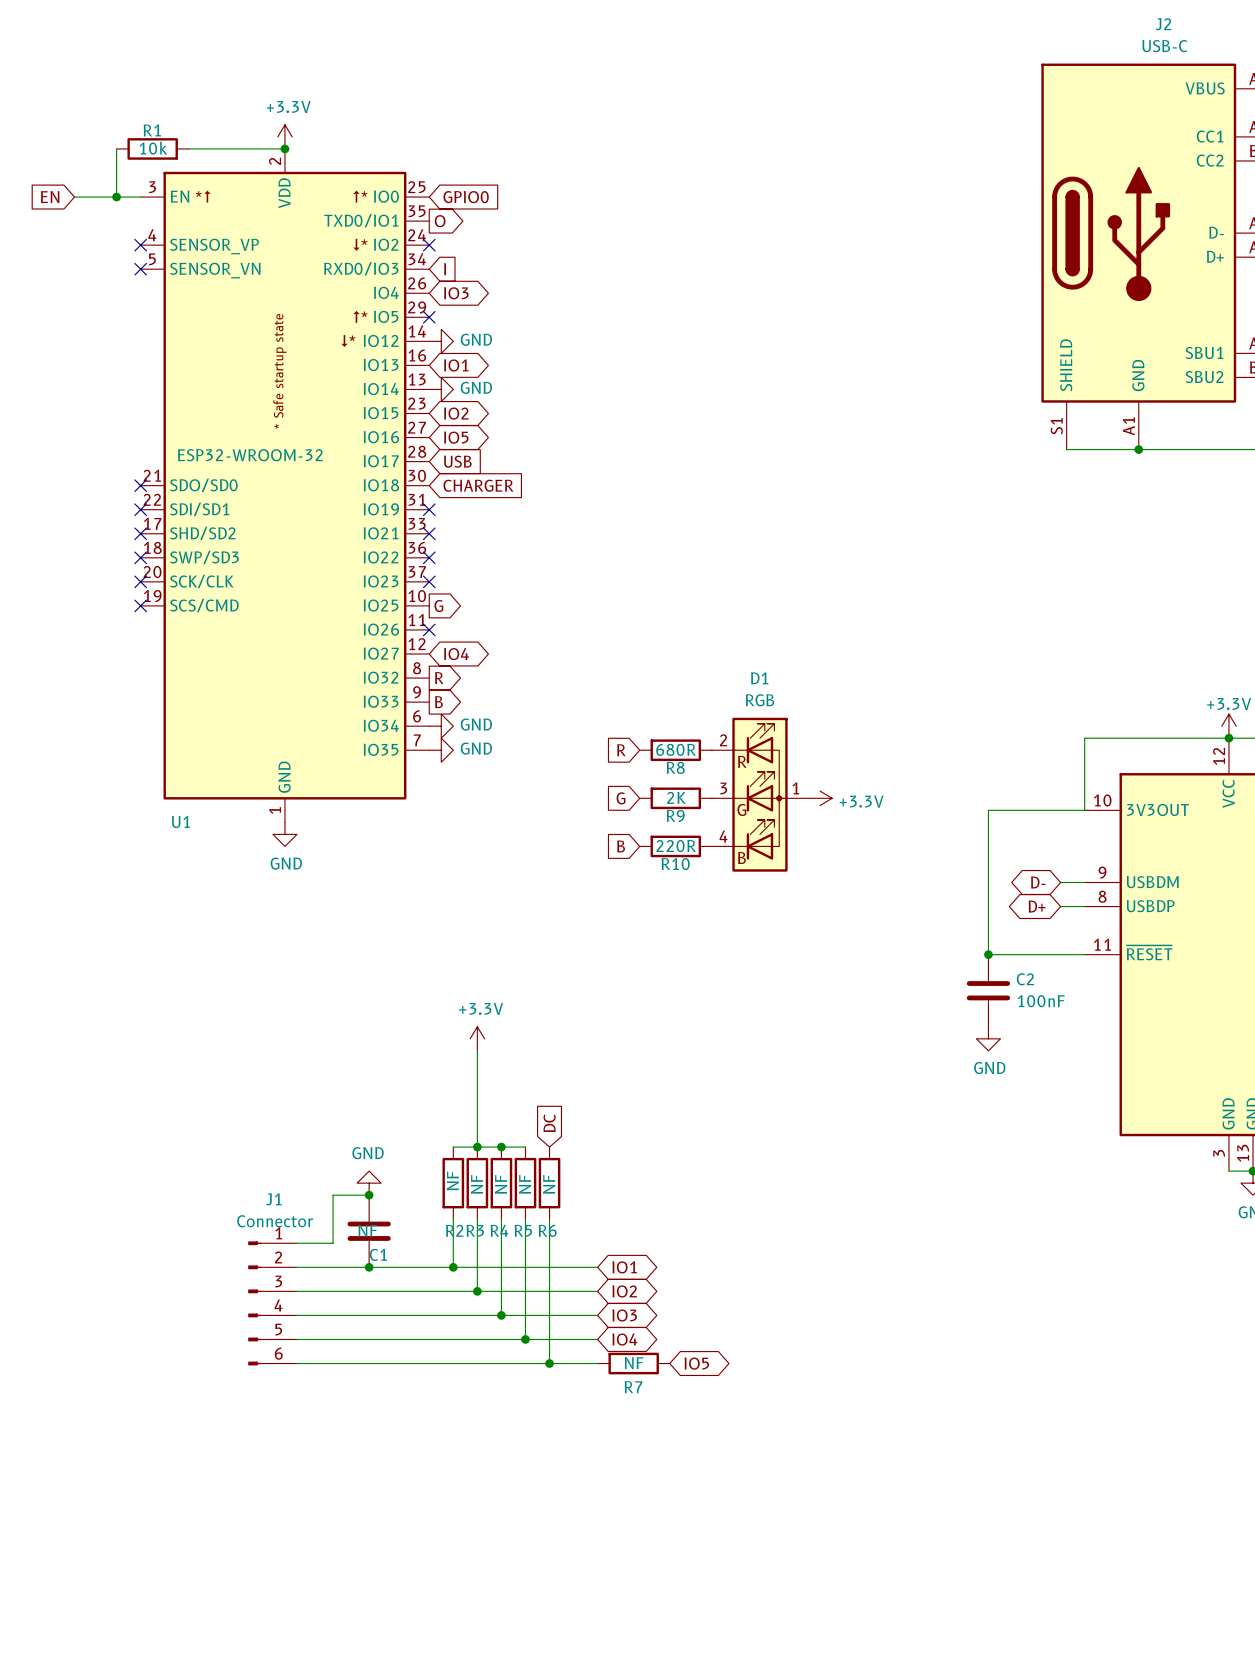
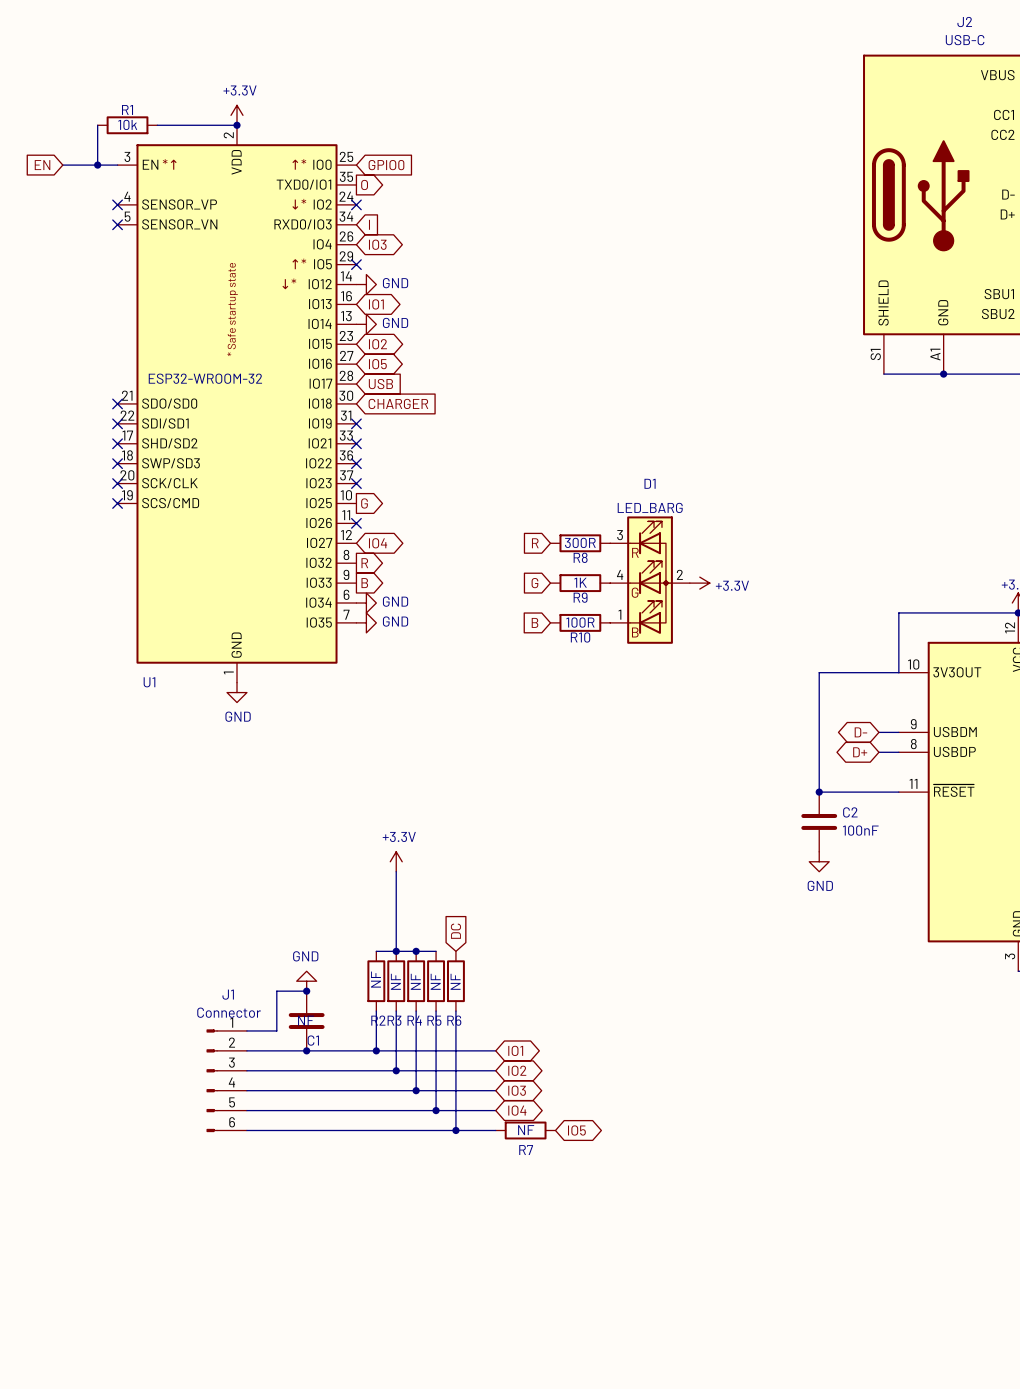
D1 value: RGB (759, 700) -> LED_BARG (650, 507)
D1 pin number: 2 (723, 740) -> 3 (620, 535)
R8 value: 680R (676, 749) -> 300R (580, 542)
global label position: R (621, 750) -> R (535, 543)
R8 position: (675, 750) -> (580, 543)
D1 pin number: 3 (723, 788) -> 4 (620, 574)
D1 pin number: 1 (795, 788) -> 2 (679, 574)
D1 position: (759, 794) -> (650, 580)
R9 value: 2K (676, 797) -> 1K (580, 582)
global label position: G (621, 798) -> G (534, 583)
R9 position: (675, 798) -> (580, 583)
power symbol position: +3.3V (820, 798) -> +3.3V (699, 583)
D1 pin number: 4 (723, 836) -> 1 (619, 614)
global label position: B (621, 846) -> B (535, 622)
R10 position: (675, 846) -> (580, 622)
R10 value: 220R (676, 846) -> 100R (580, 622)

